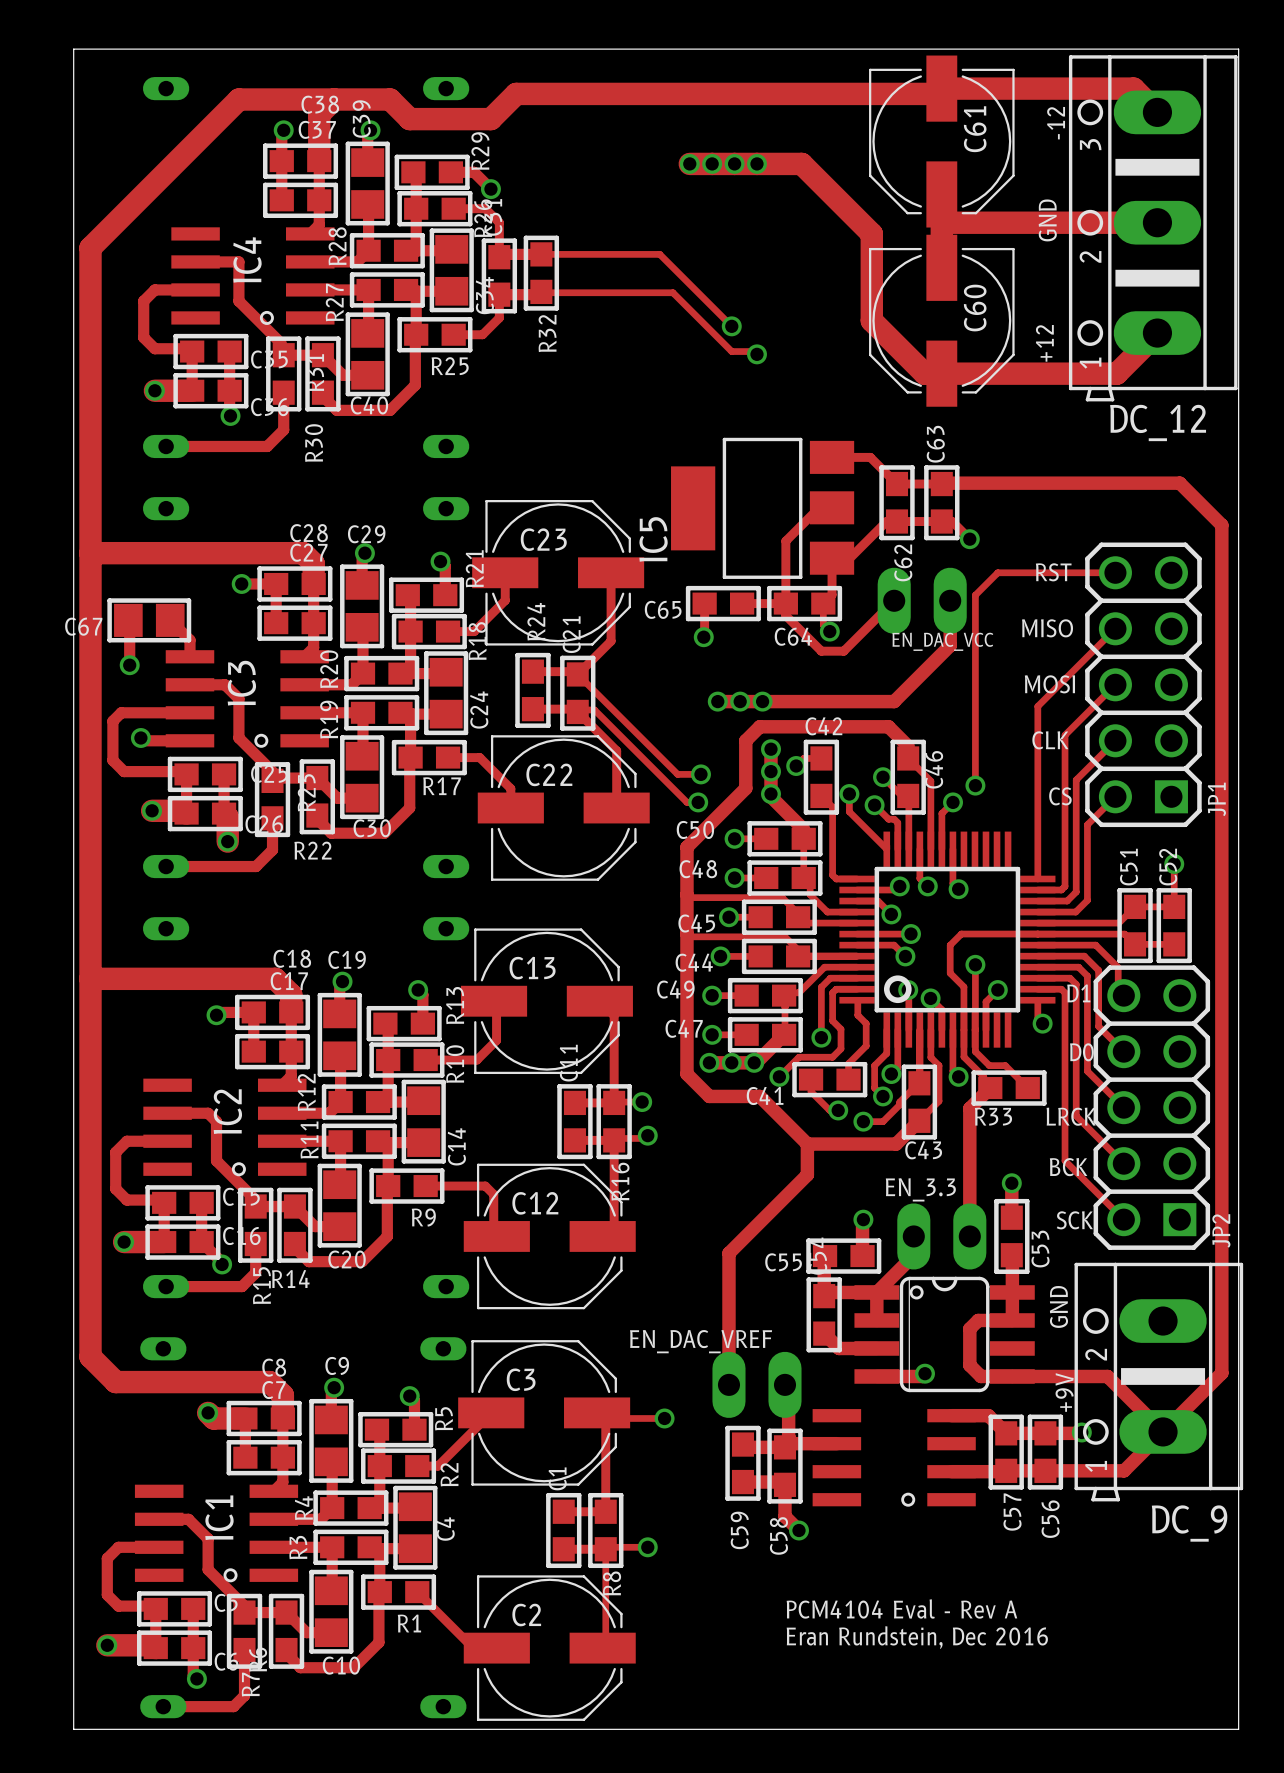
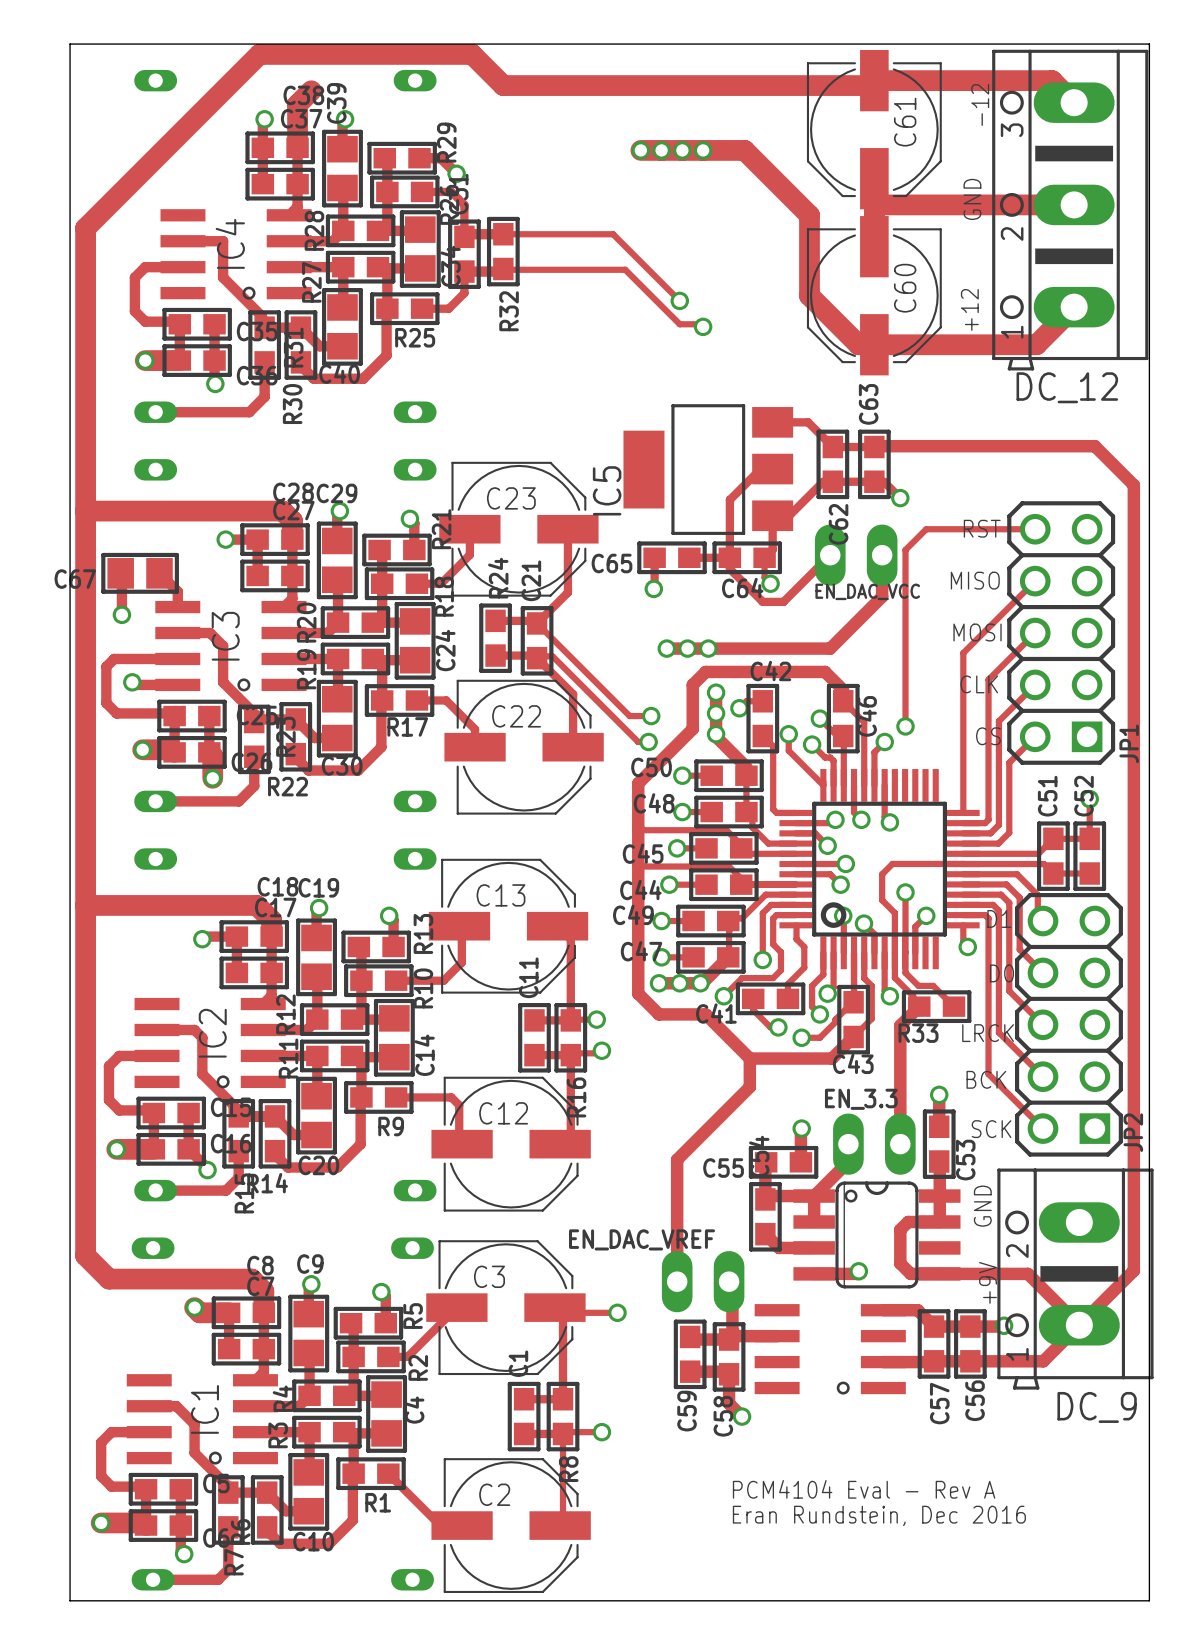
track: (541, 93) (516, 93) (490, 119) (409, 119) (390, 99) (238, 99) -> (503, 85) (472, 54) (259, 54) (223, 90)

